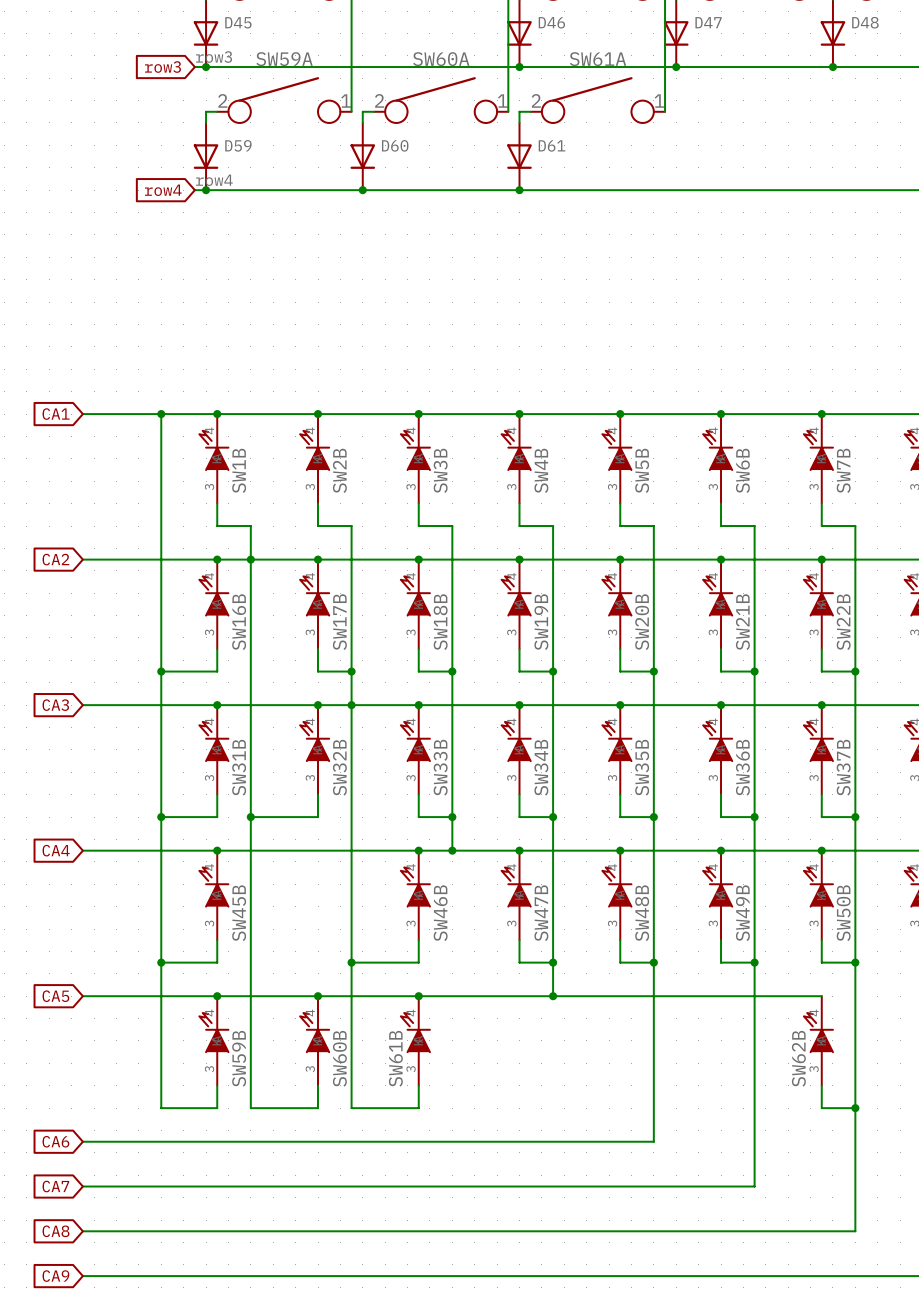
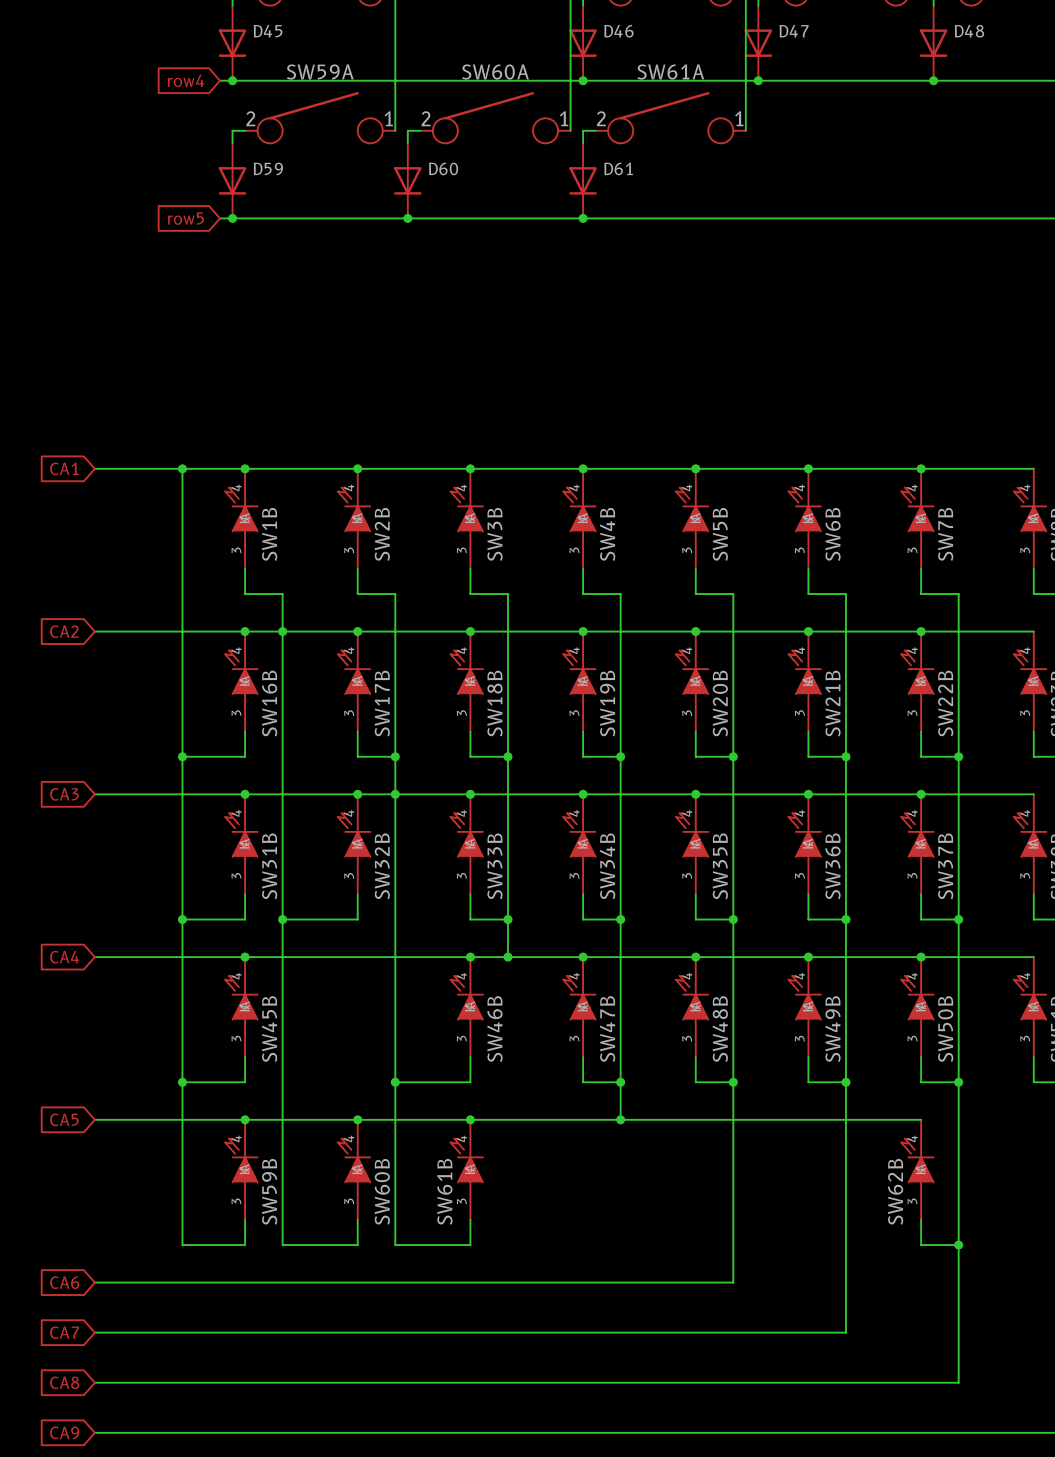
label: row3 (214, 57) -> none
global label: row3 (162, 67) -> row4 (186, 80)
label: row4 (214, 180) -> none
global label: row4 (163, 190) -> row5 (185, 218)

